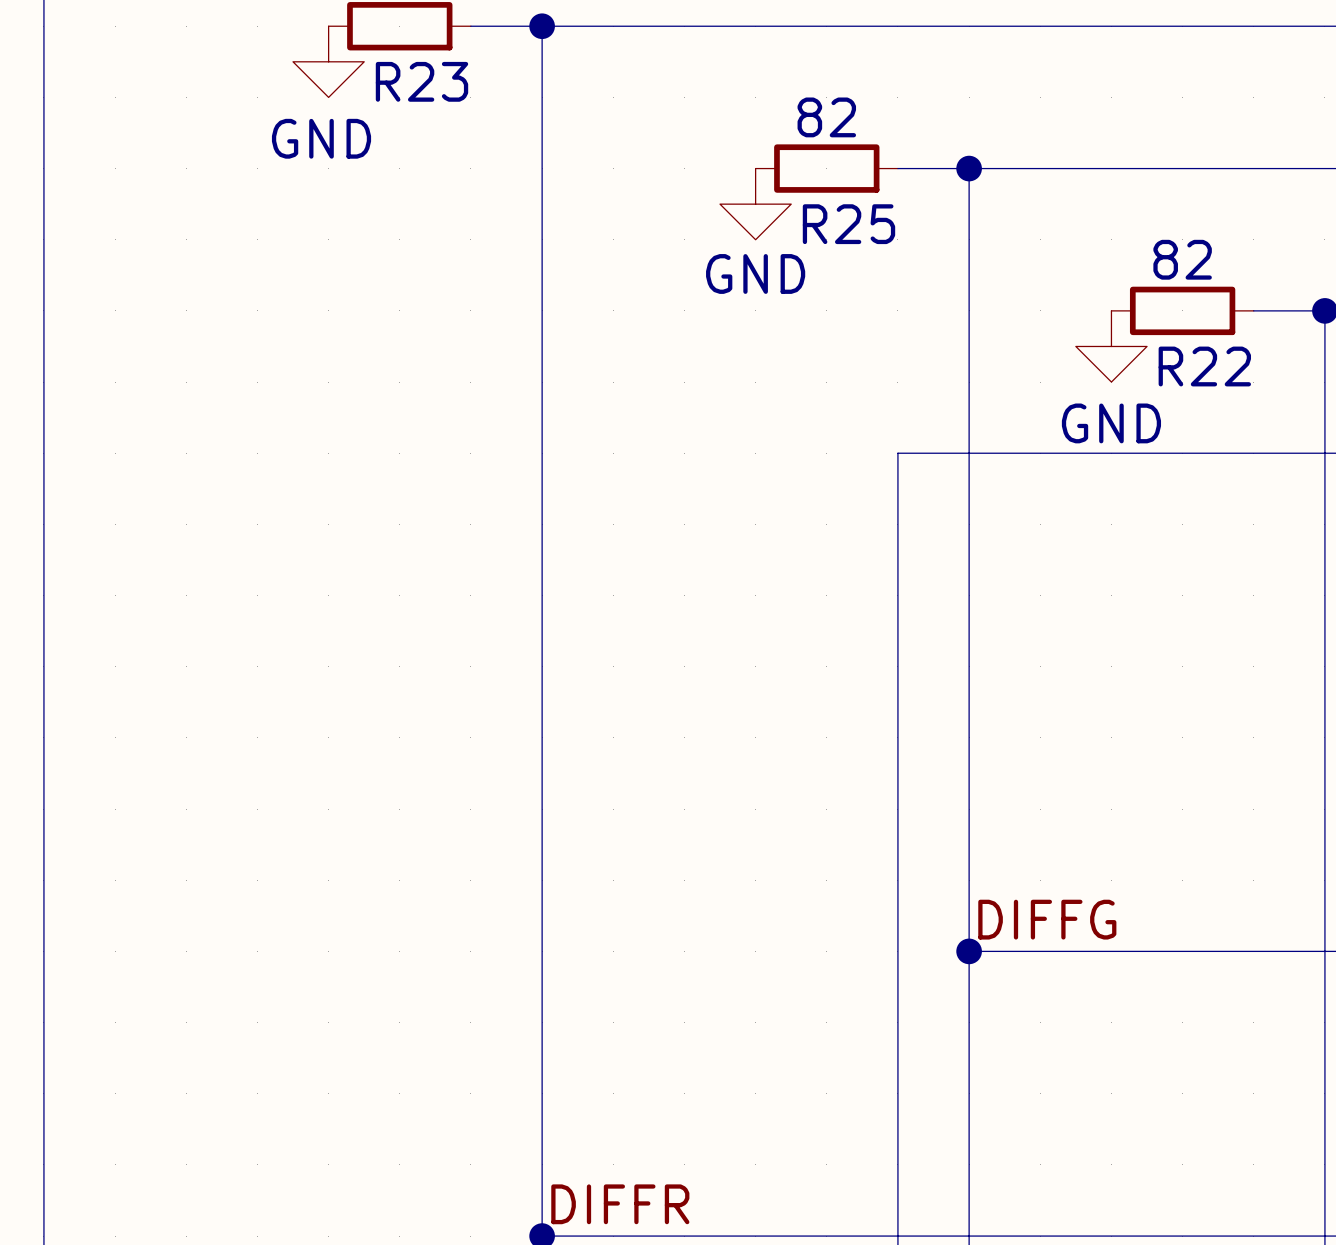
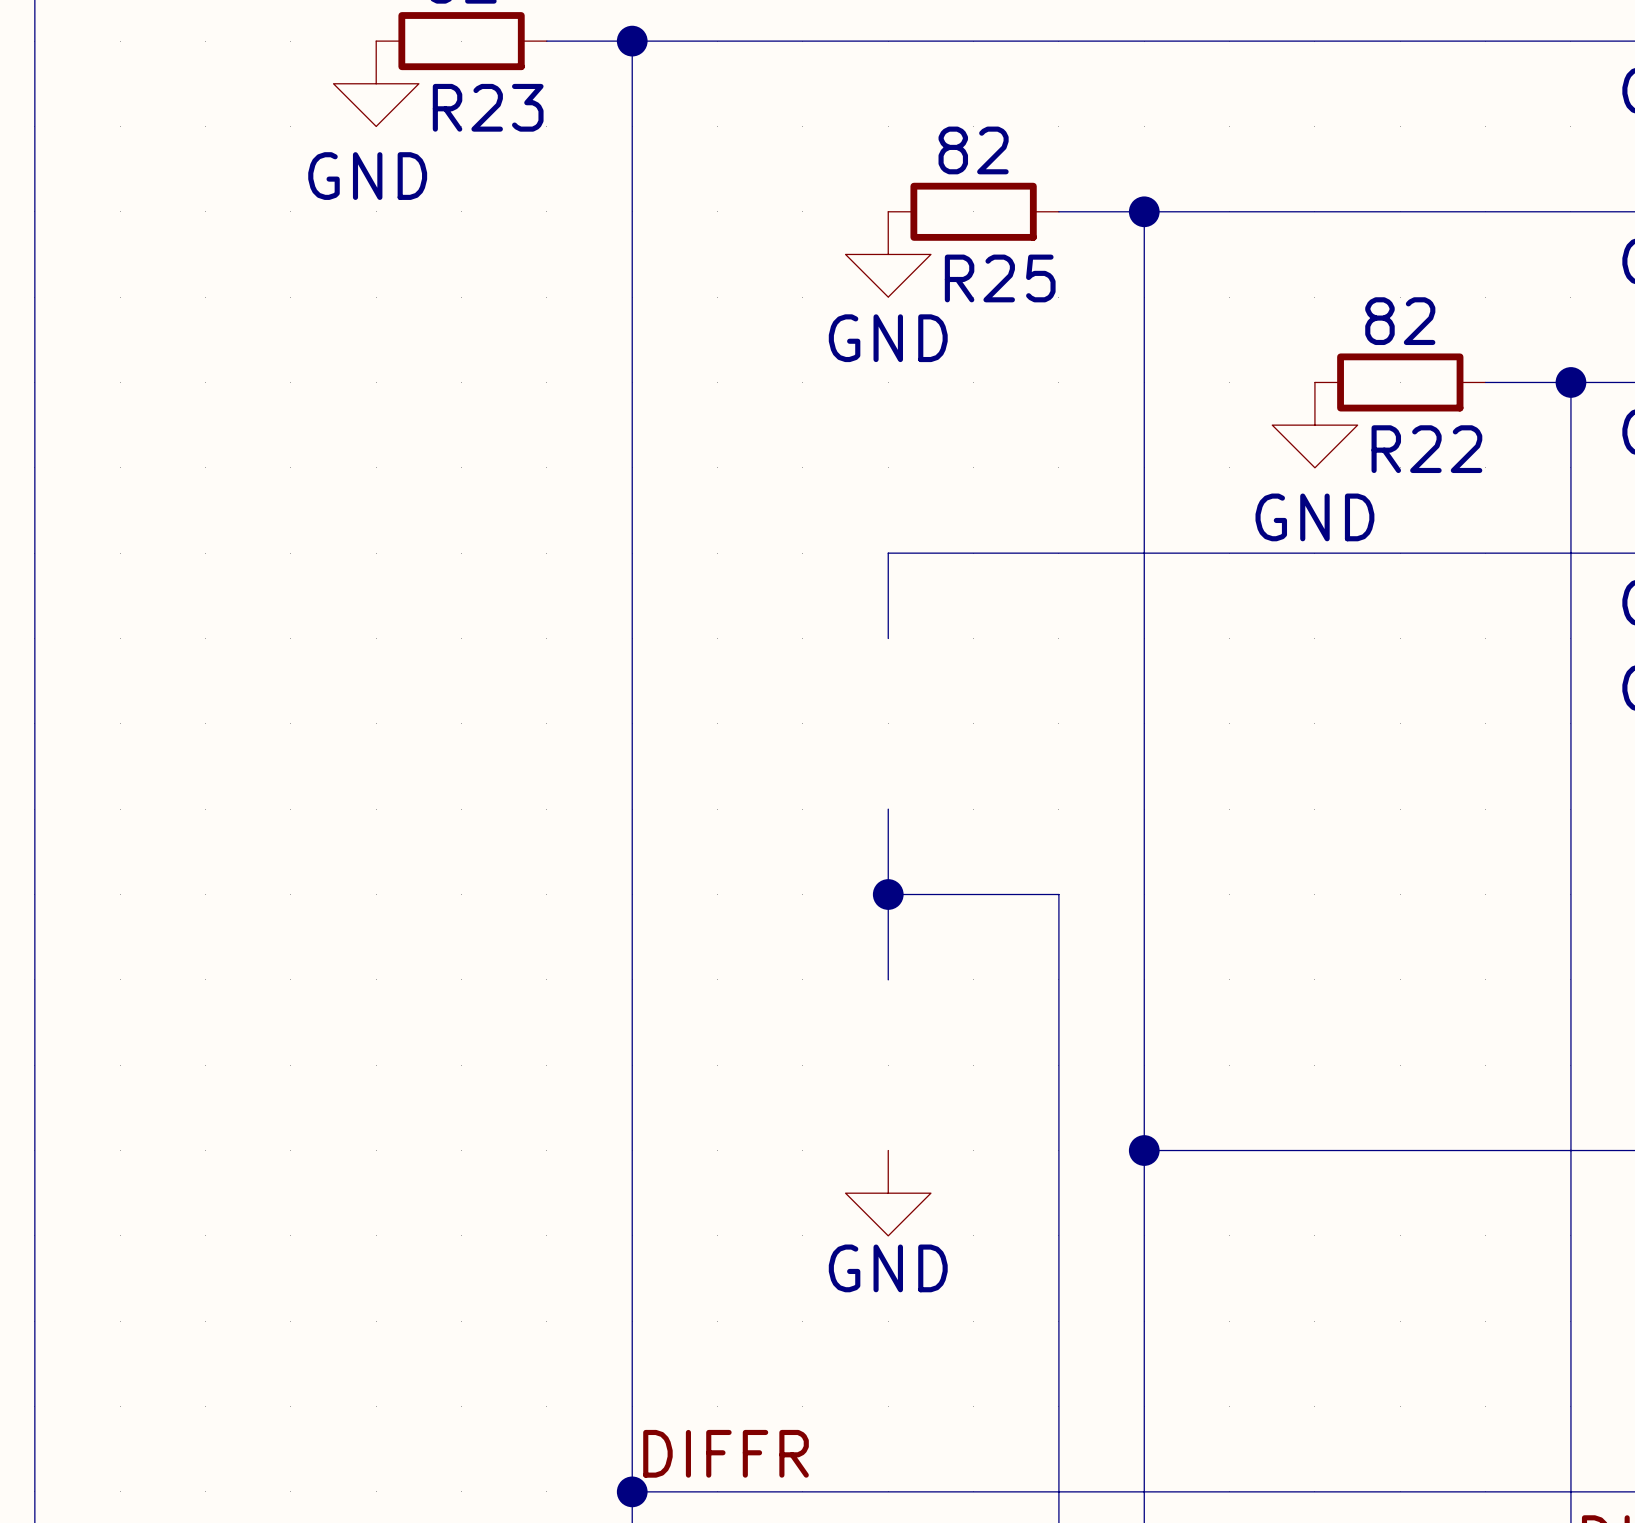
wire: (897, 453) (897, 737) -> (1058, 553) (888, 553) (888, 638)
wire: none -> (888, 809) (888, 979)
wire: none -> (888, 894) (1058, 894)
junction: none -> (888, 894)
label: DIFFG (1047, 919) -> none
power symbol: none -> GND (888, 1193)

